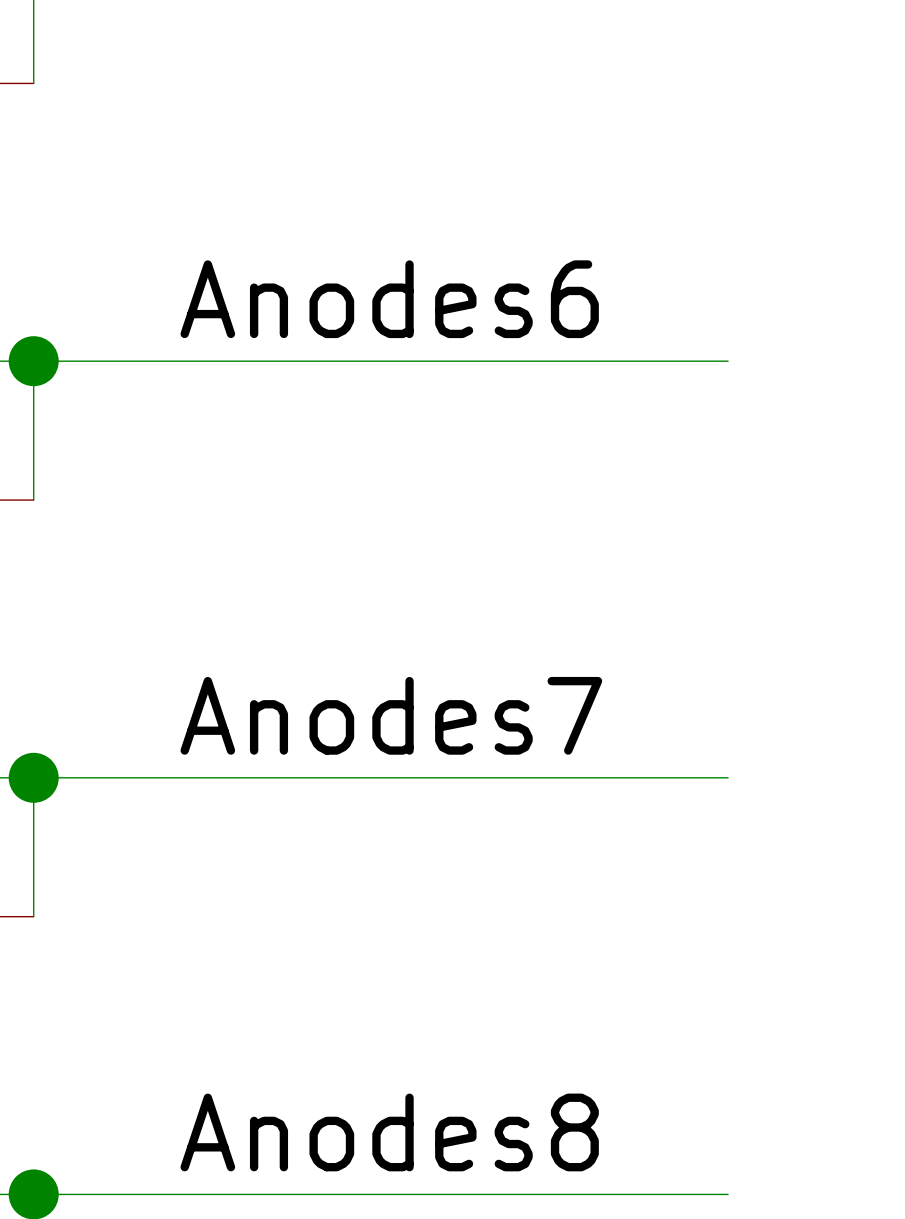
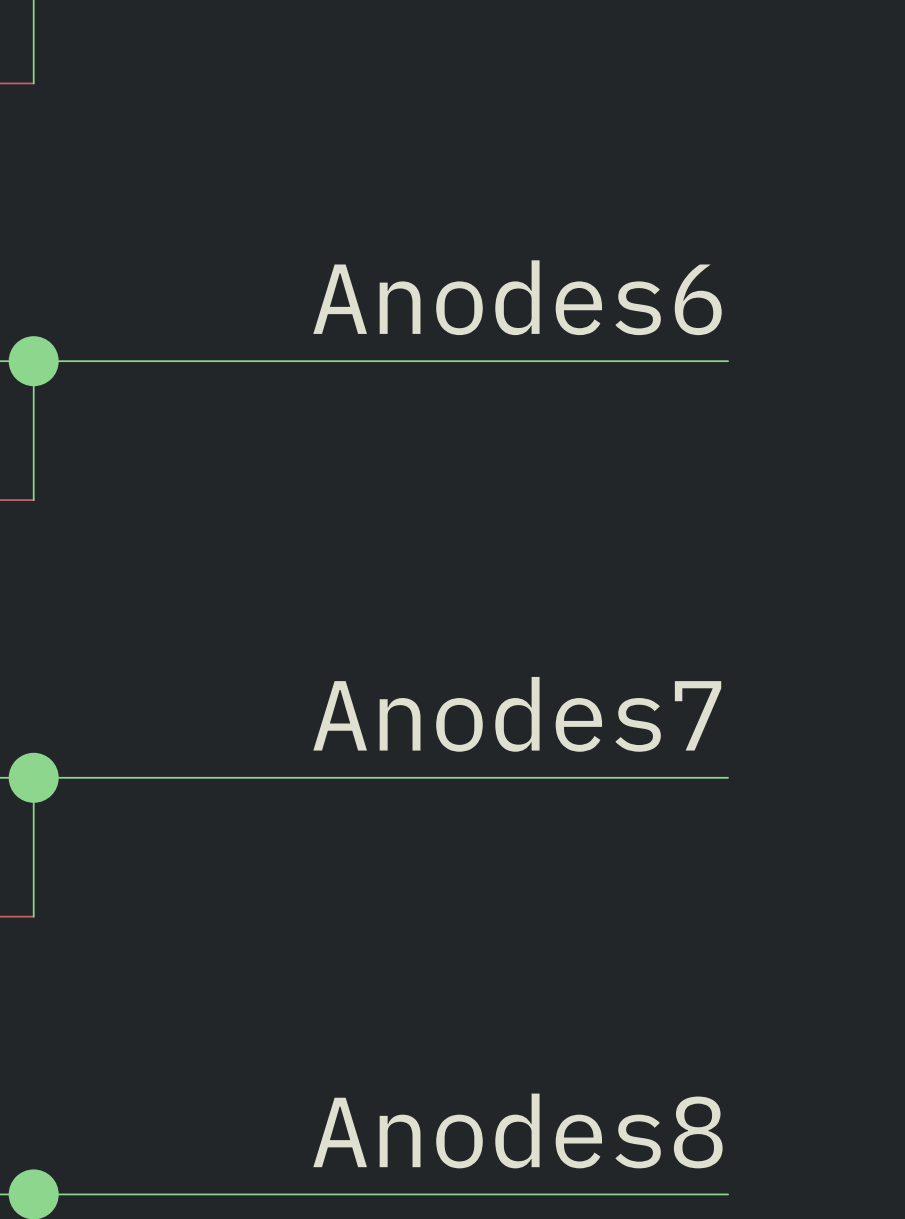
label position: Anodes6 (389, 299) -> Anodes6 (517, 297)
label position: Anodes7 (391, 715) -> Anodes7 (517, 714)
label position: Anodes8 (389, 1132) -> Anodes8 (517, 1130)

